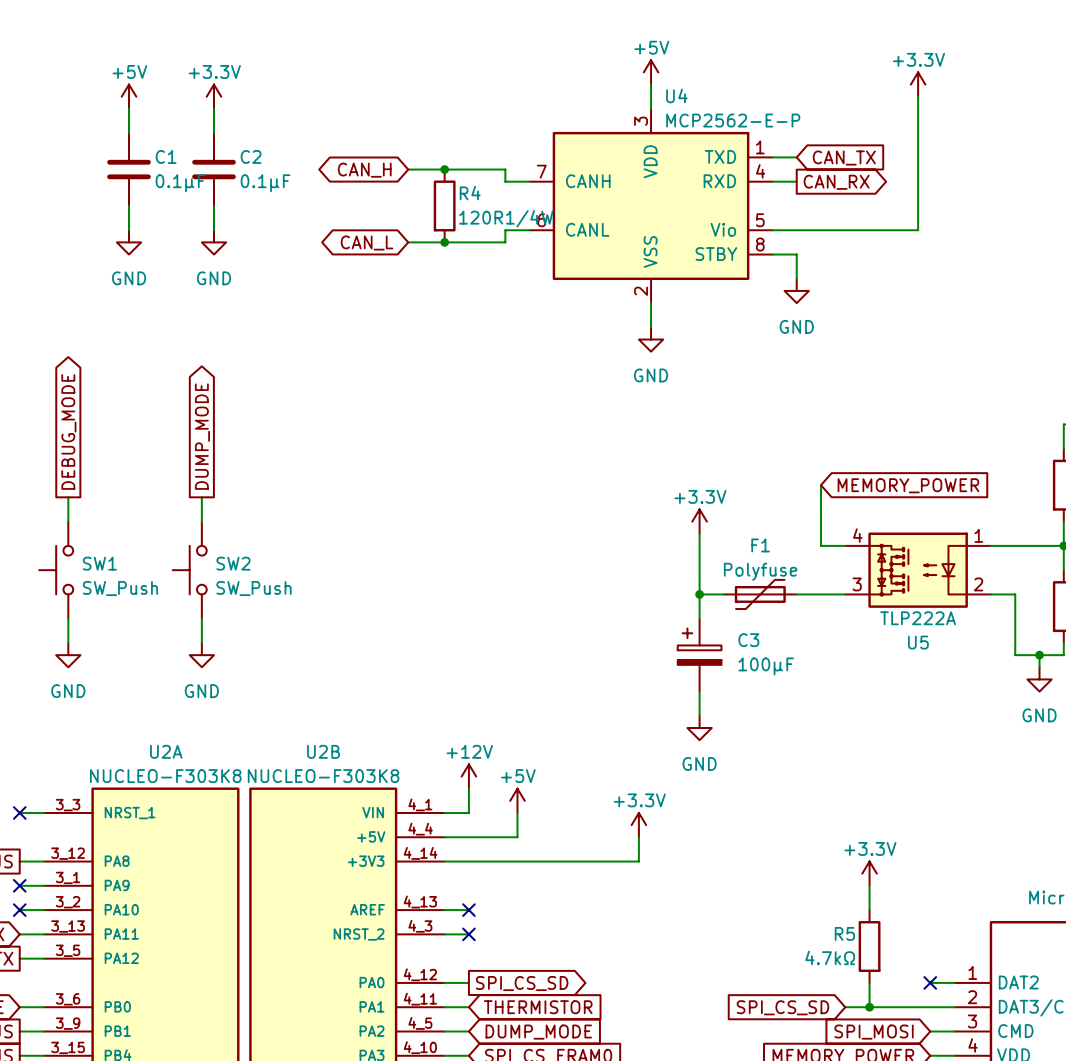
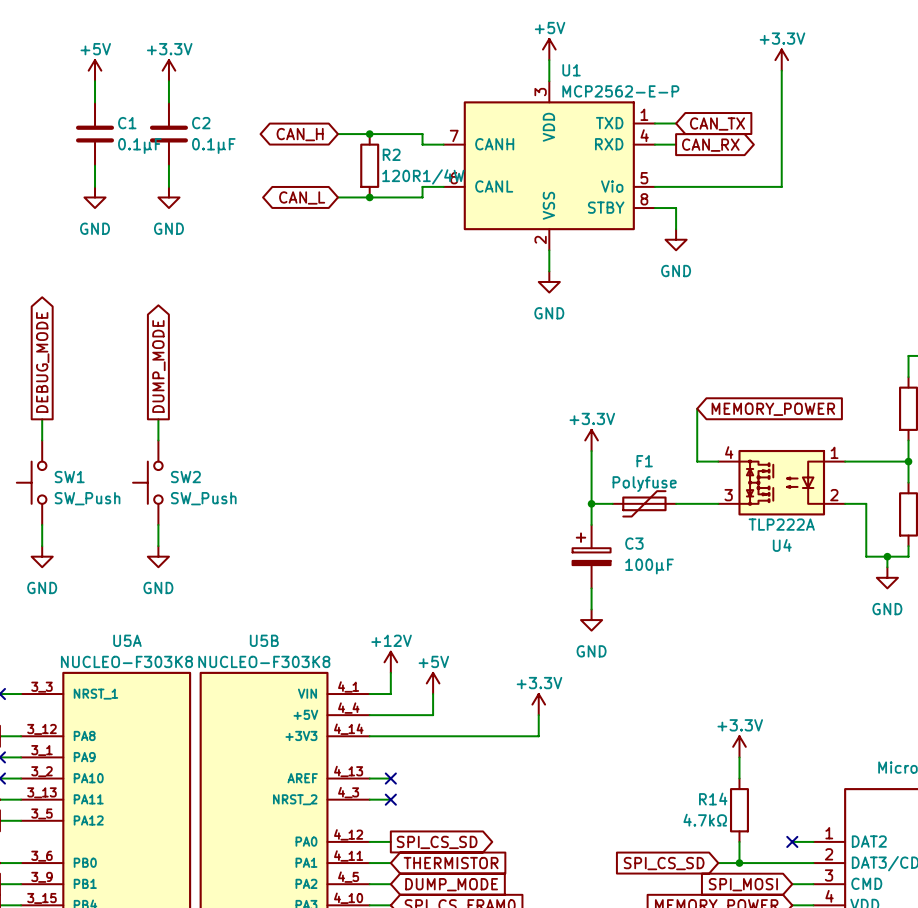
U4 name: U4 (676, 95) -> U1 (571, 70)
R4 name: R4 (470, 193) -> R2 (391, 154)
U5 name: U5 (918, 642) -> U4 (782, 545)
U2A name: U2A (166, 751) -> U5A (127, 640)
U2B name: U2B (323, 751) -> U5B (264, 640)
R5 name: R5 (844, 933) -> R14 (713, 799)

